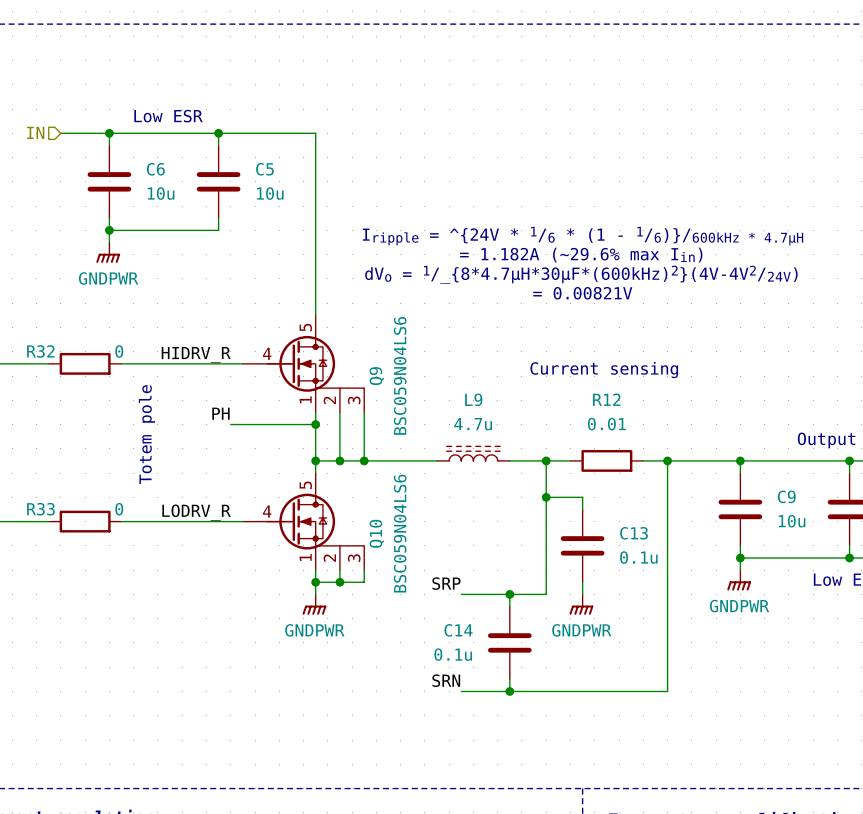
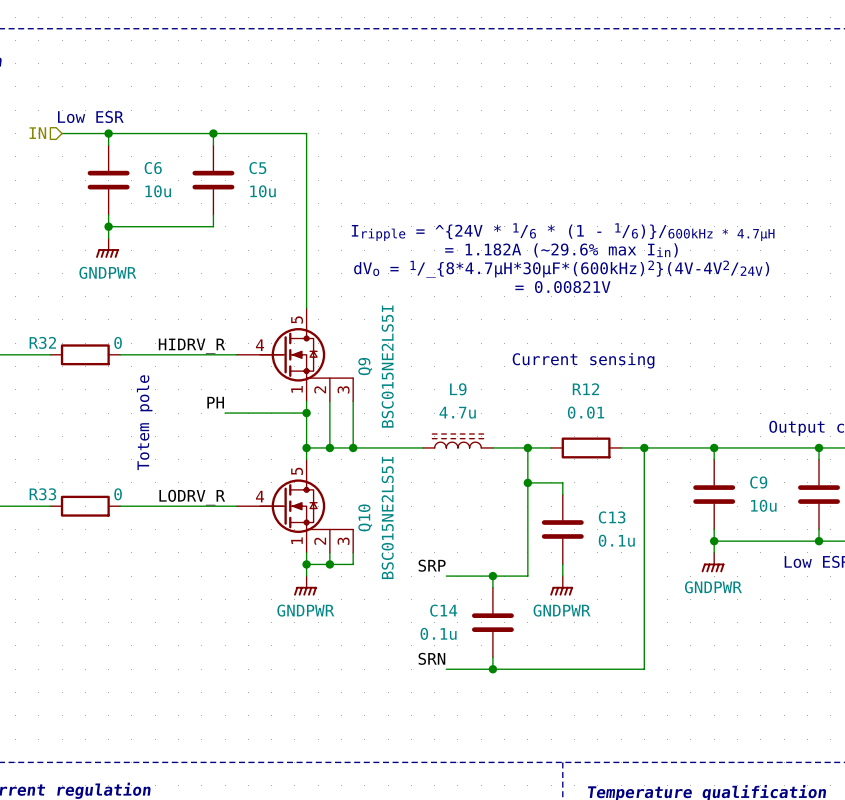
text position: Low ESR (168, 116) -> Low ESR (90, 117)
Q9 value: BSC059N04LS6 (400, 375) -> BSC015NE2LS5I (387, 366)
Q10 value: BSC059N04LS6 (400, 533) -> BSC015NE2LS5I (387, 517)

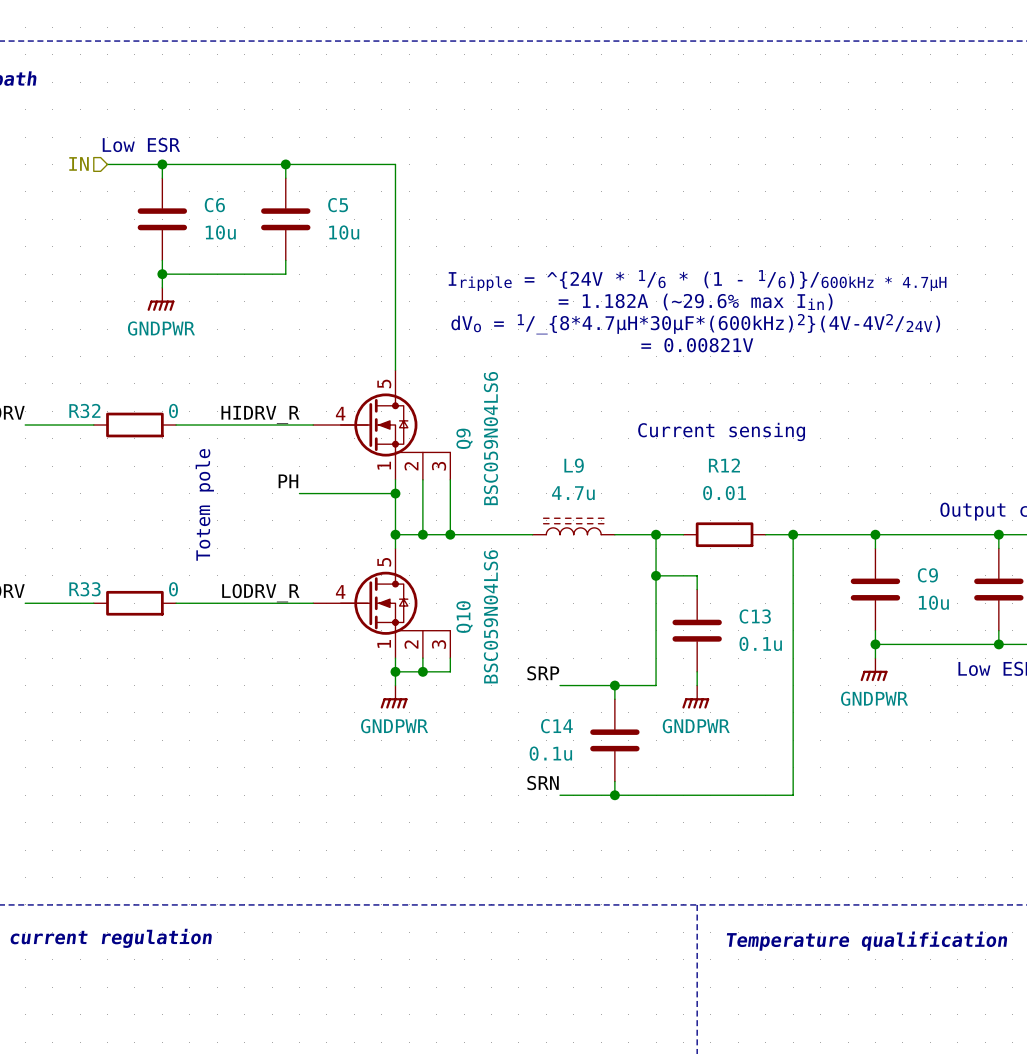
Q9 value: BSC015NE2LS5I (387, 366) -> BSC059N04LS6 (490, 438)
Q10 value: BSC015NE2LS5I (387, 517) -> BSC059N04LS6 (490, 616)

